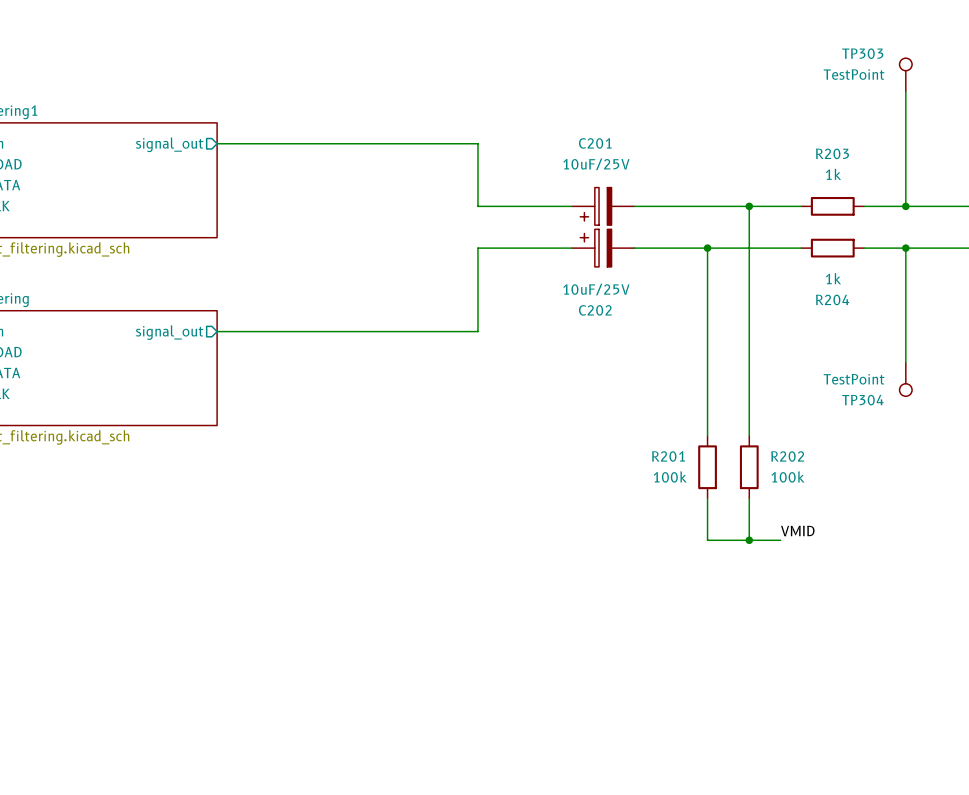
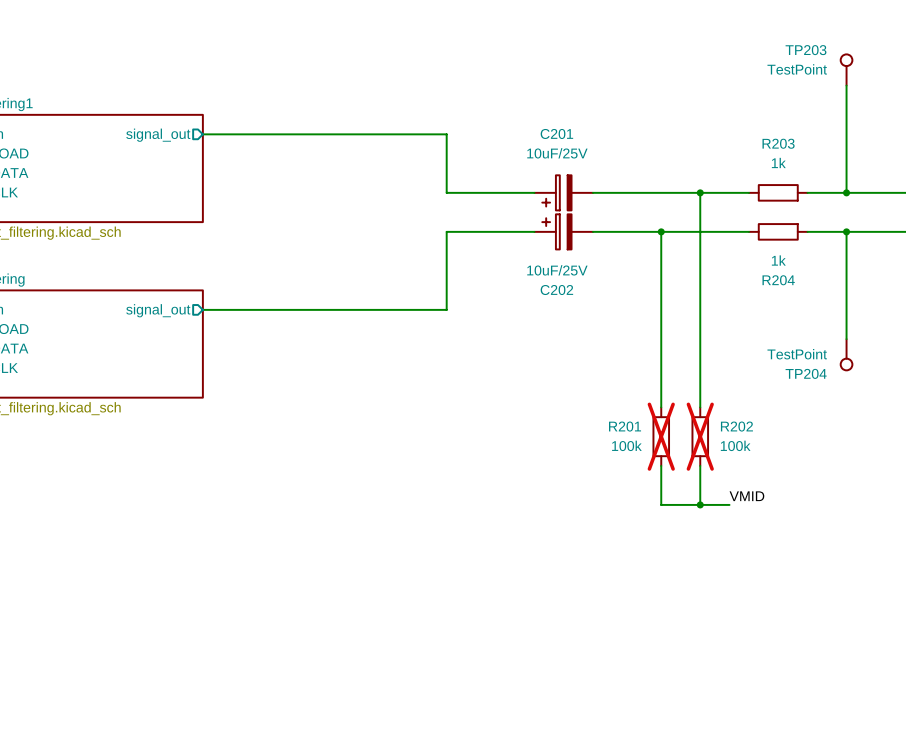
TP303 name: TP303 (862, 53) -> TP203 (806, 50)
TP304 name: TP304 (862, 400) -> TP204 (806, 373)
R201 do-not-place cross: none -> (661, 436)
R202 do-not-place cross: none -> (700, 436)

